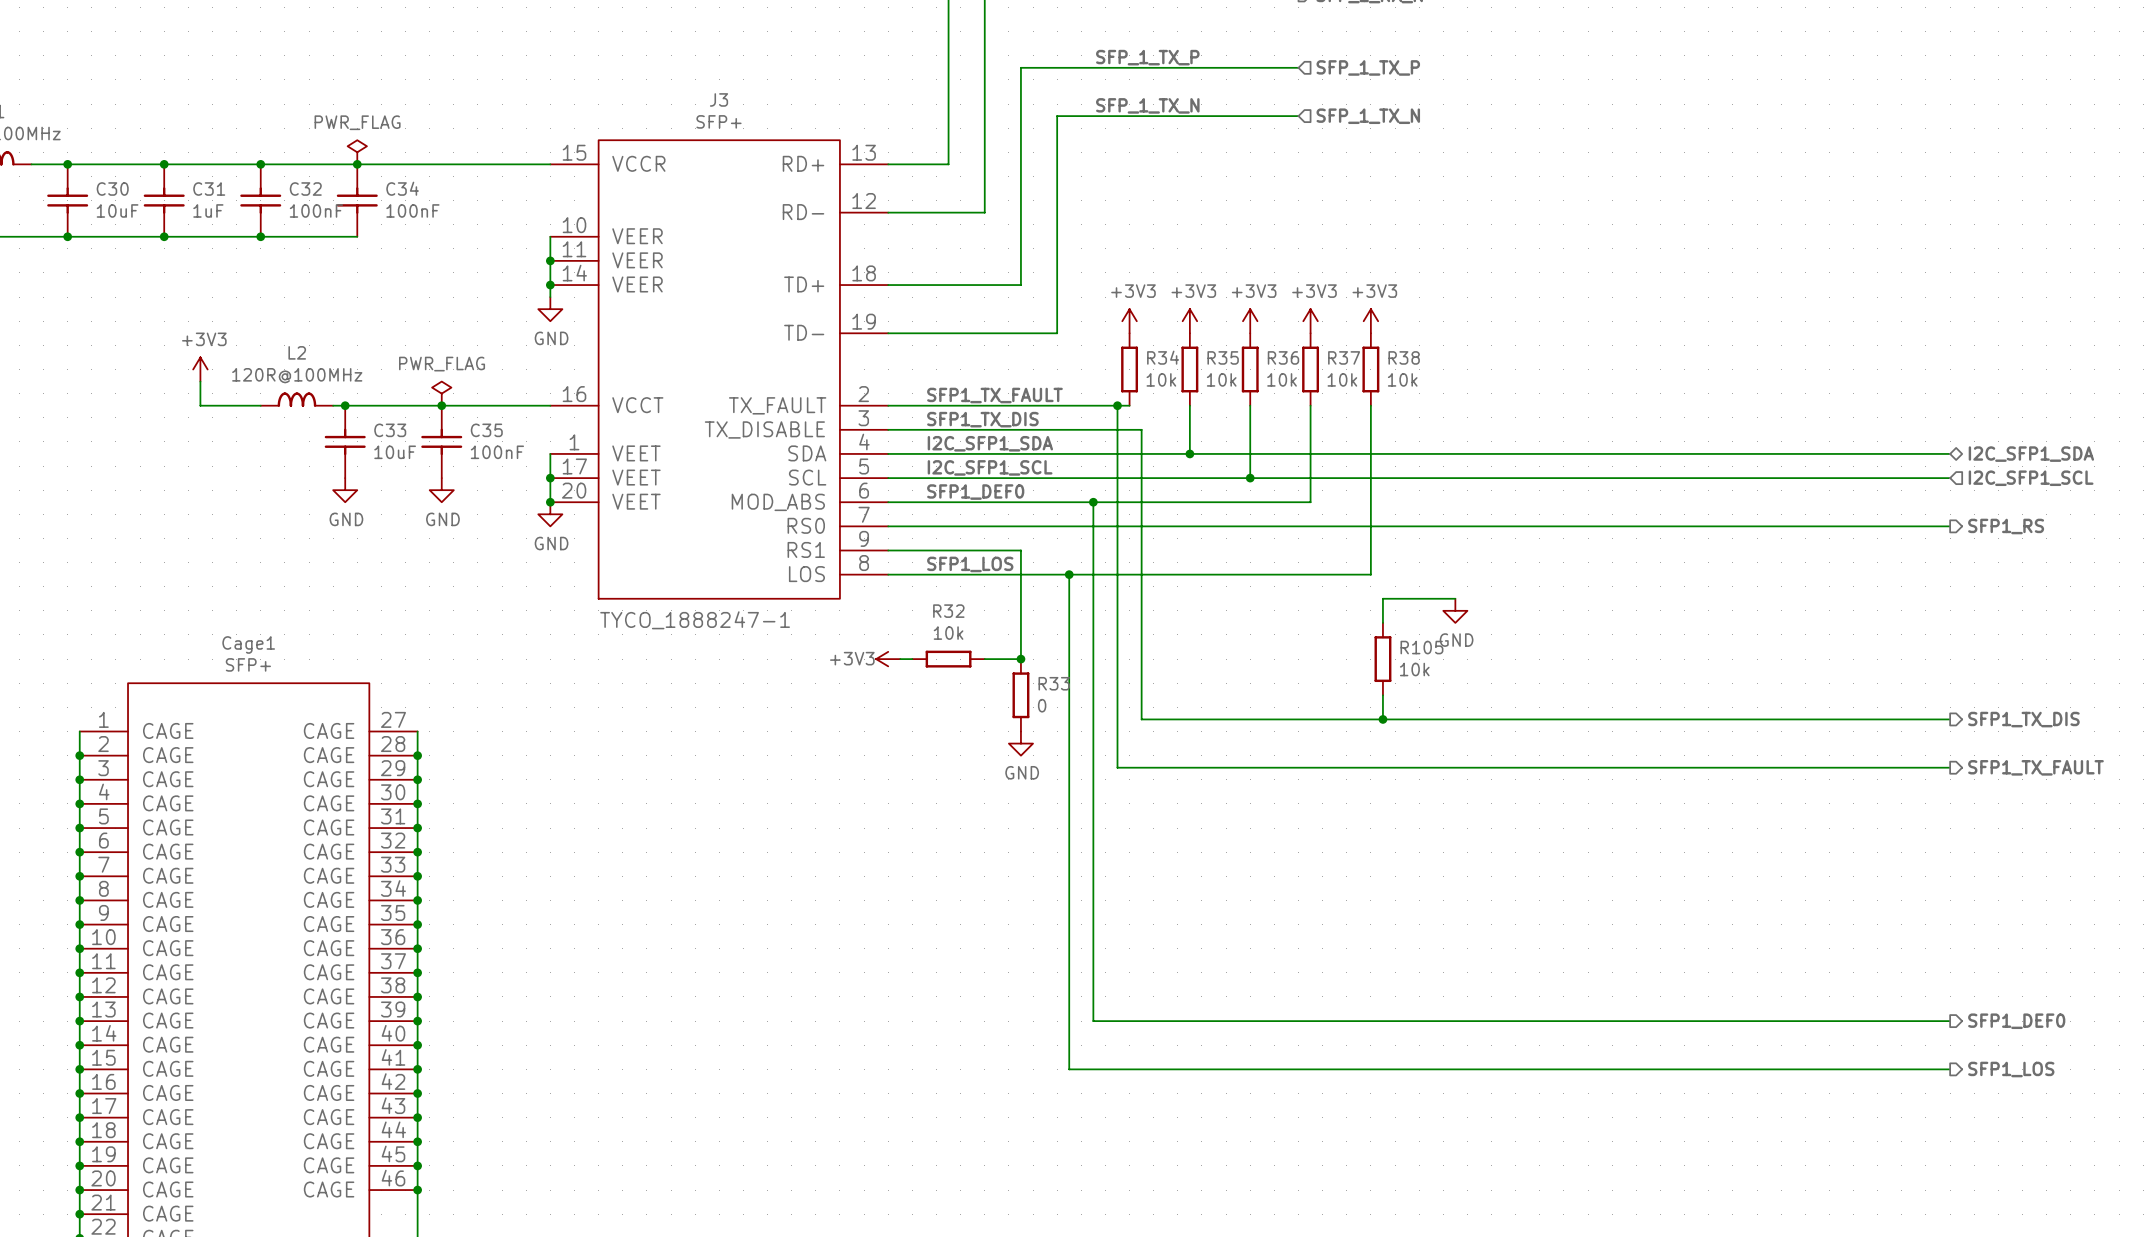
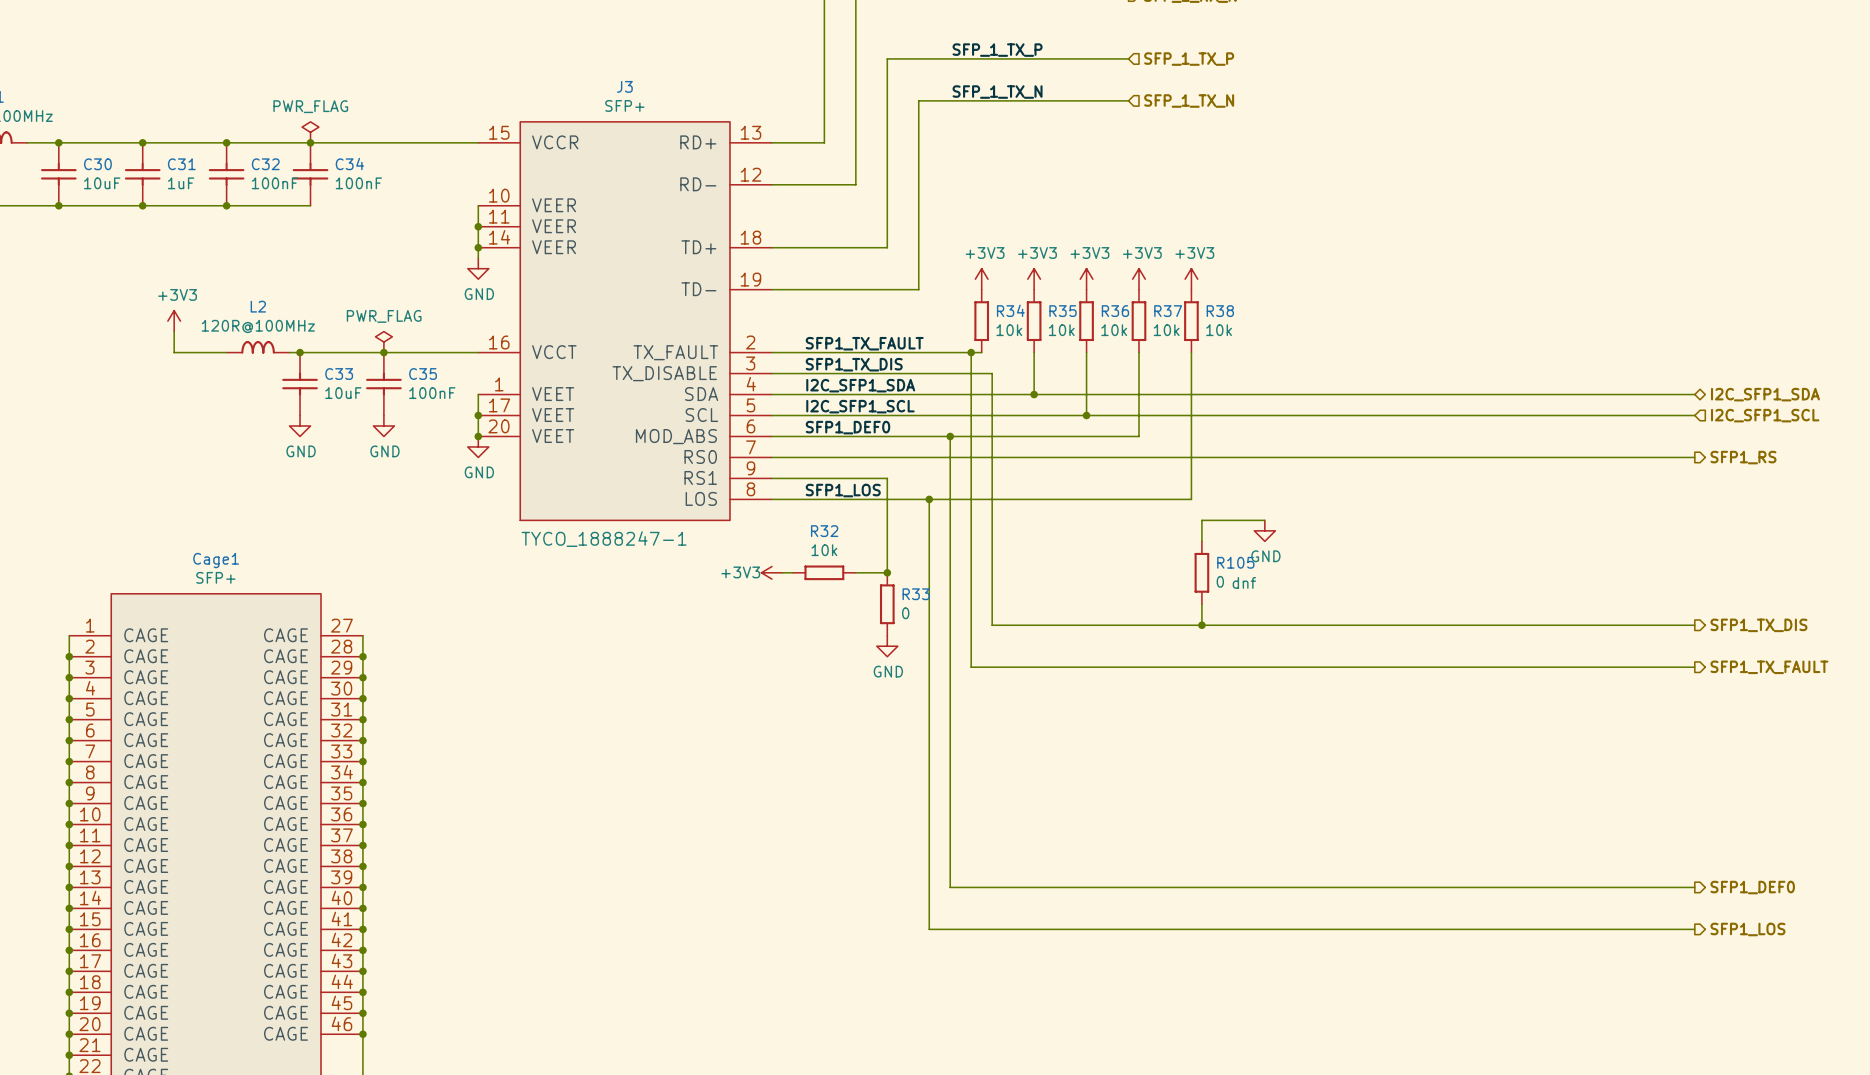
R105 text: 10k (1414, 669) -> 0 (1220, 581)
R105 text: none -> dnf (1244, 582)

